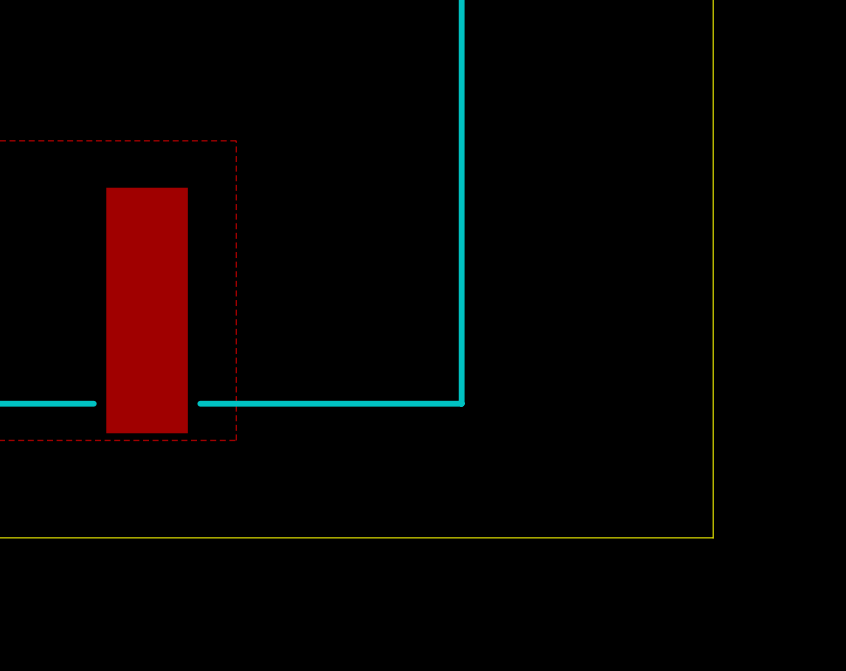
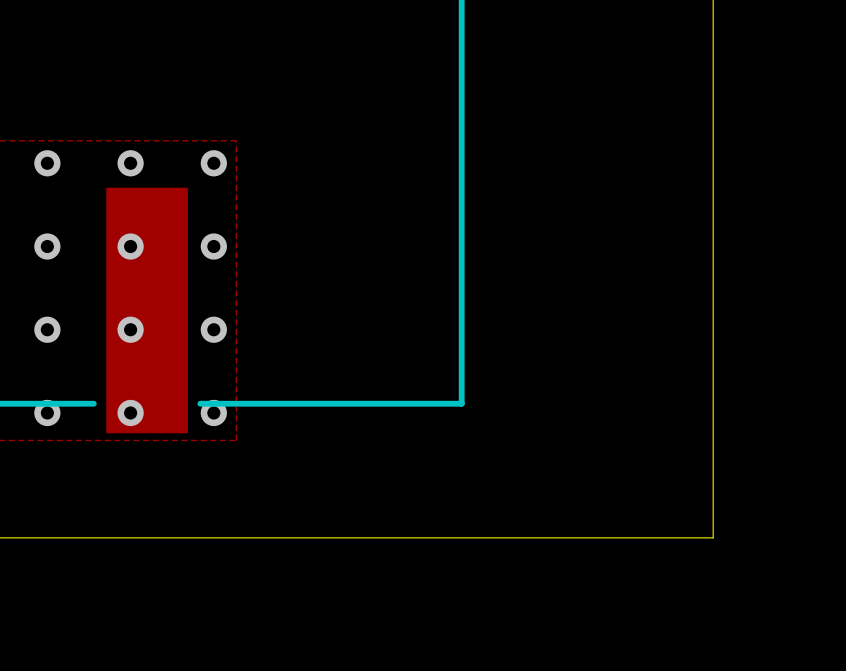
via: none -> (47, 163)
via: none -> (130, 163)
via: none -> (213, 163)
via: none -> (47, 246)
via: none -> (130, 246)
via: none -> (213, 246)
via: none -> (47, 329)
via: none -> (130, 329)
via: none -> (213, 329)
via: none -> (47, 412)
via: none -> (130, 412)
via: none -> (213, 412)

